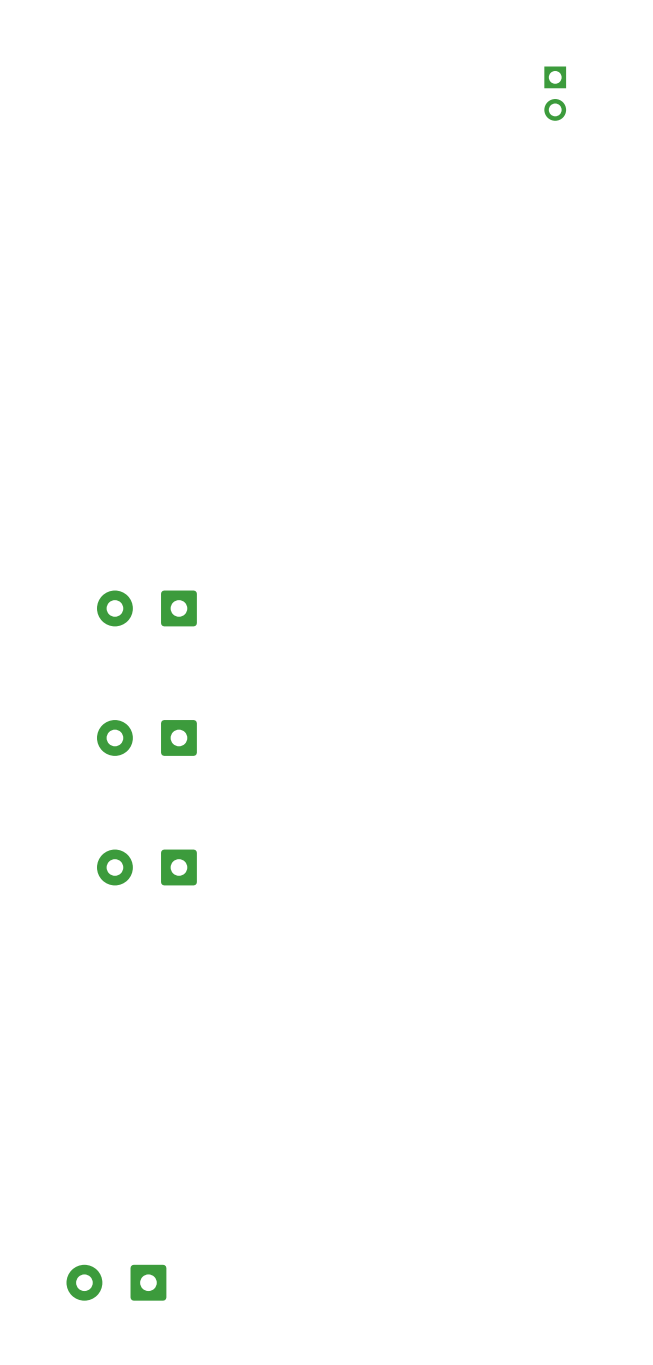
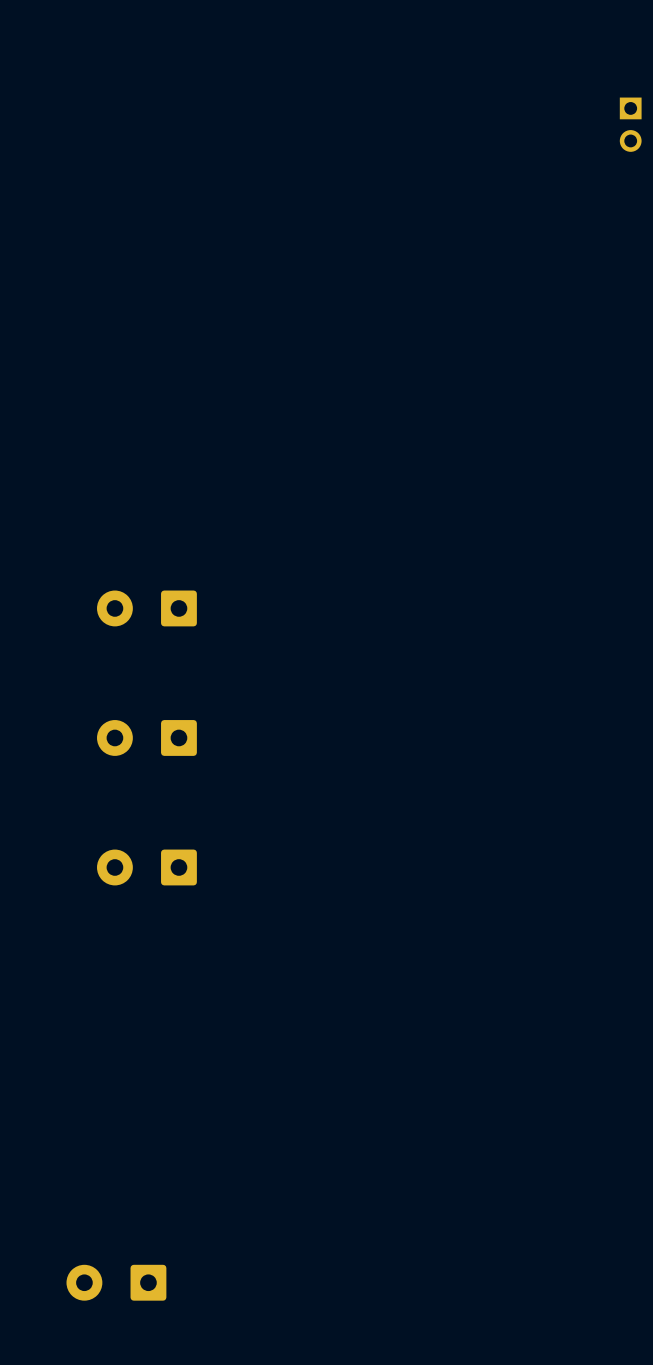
part position: (555, 93) -> (630, 124)

